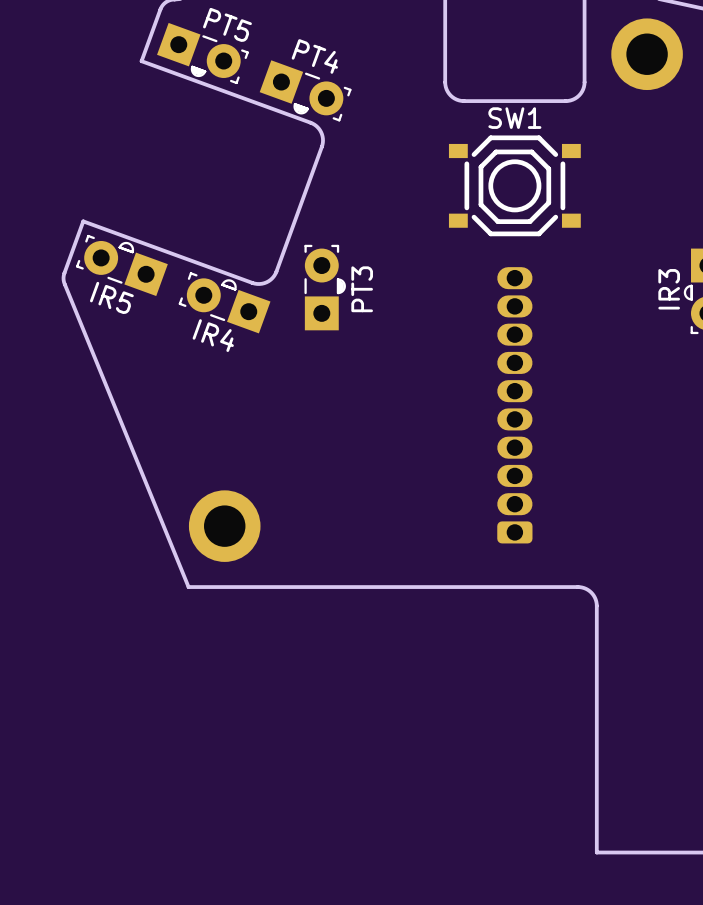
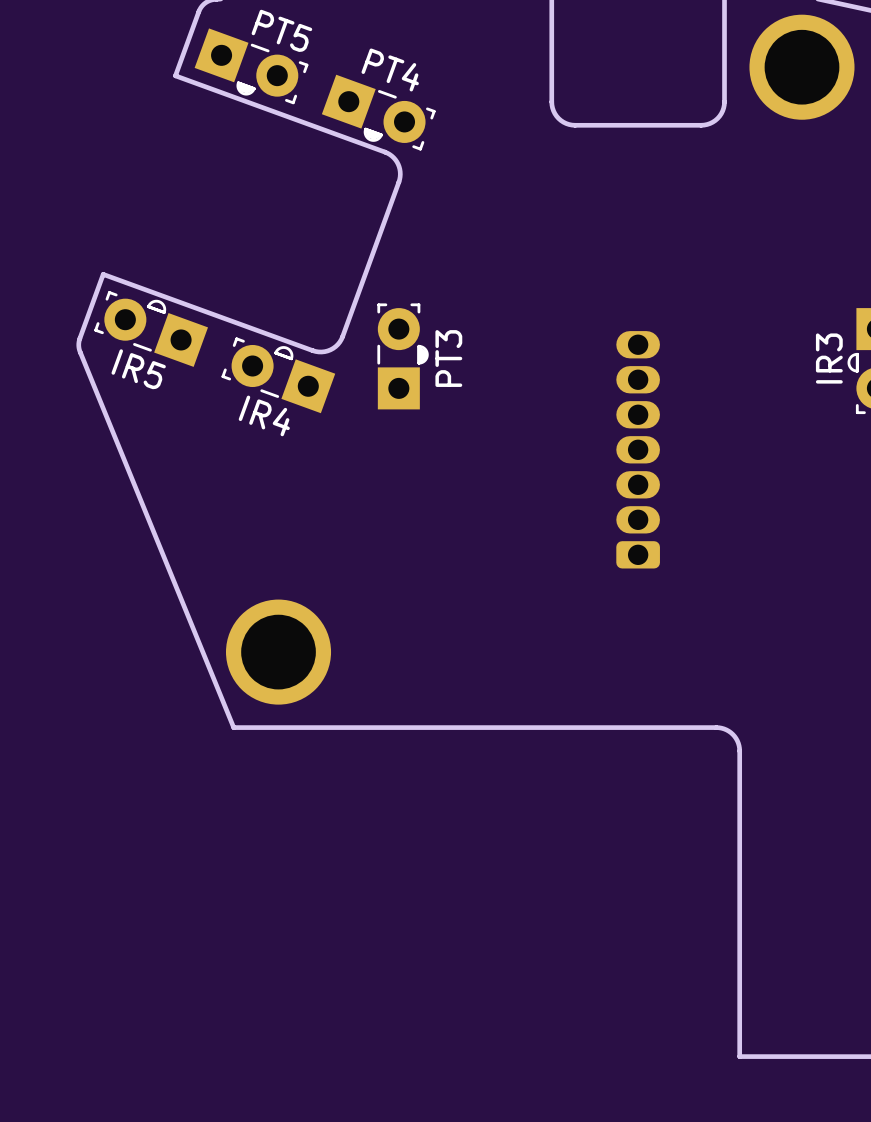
part footprint: [611, 18, 683, 91] -> [749, 14, 855, 120]
SW1: (514, 185) -> none
part: none -> (638, 449)
part: (514, 405) -> none
part footprint: [188, 490, 261, 562] -> [225, 599, 332, 705]

